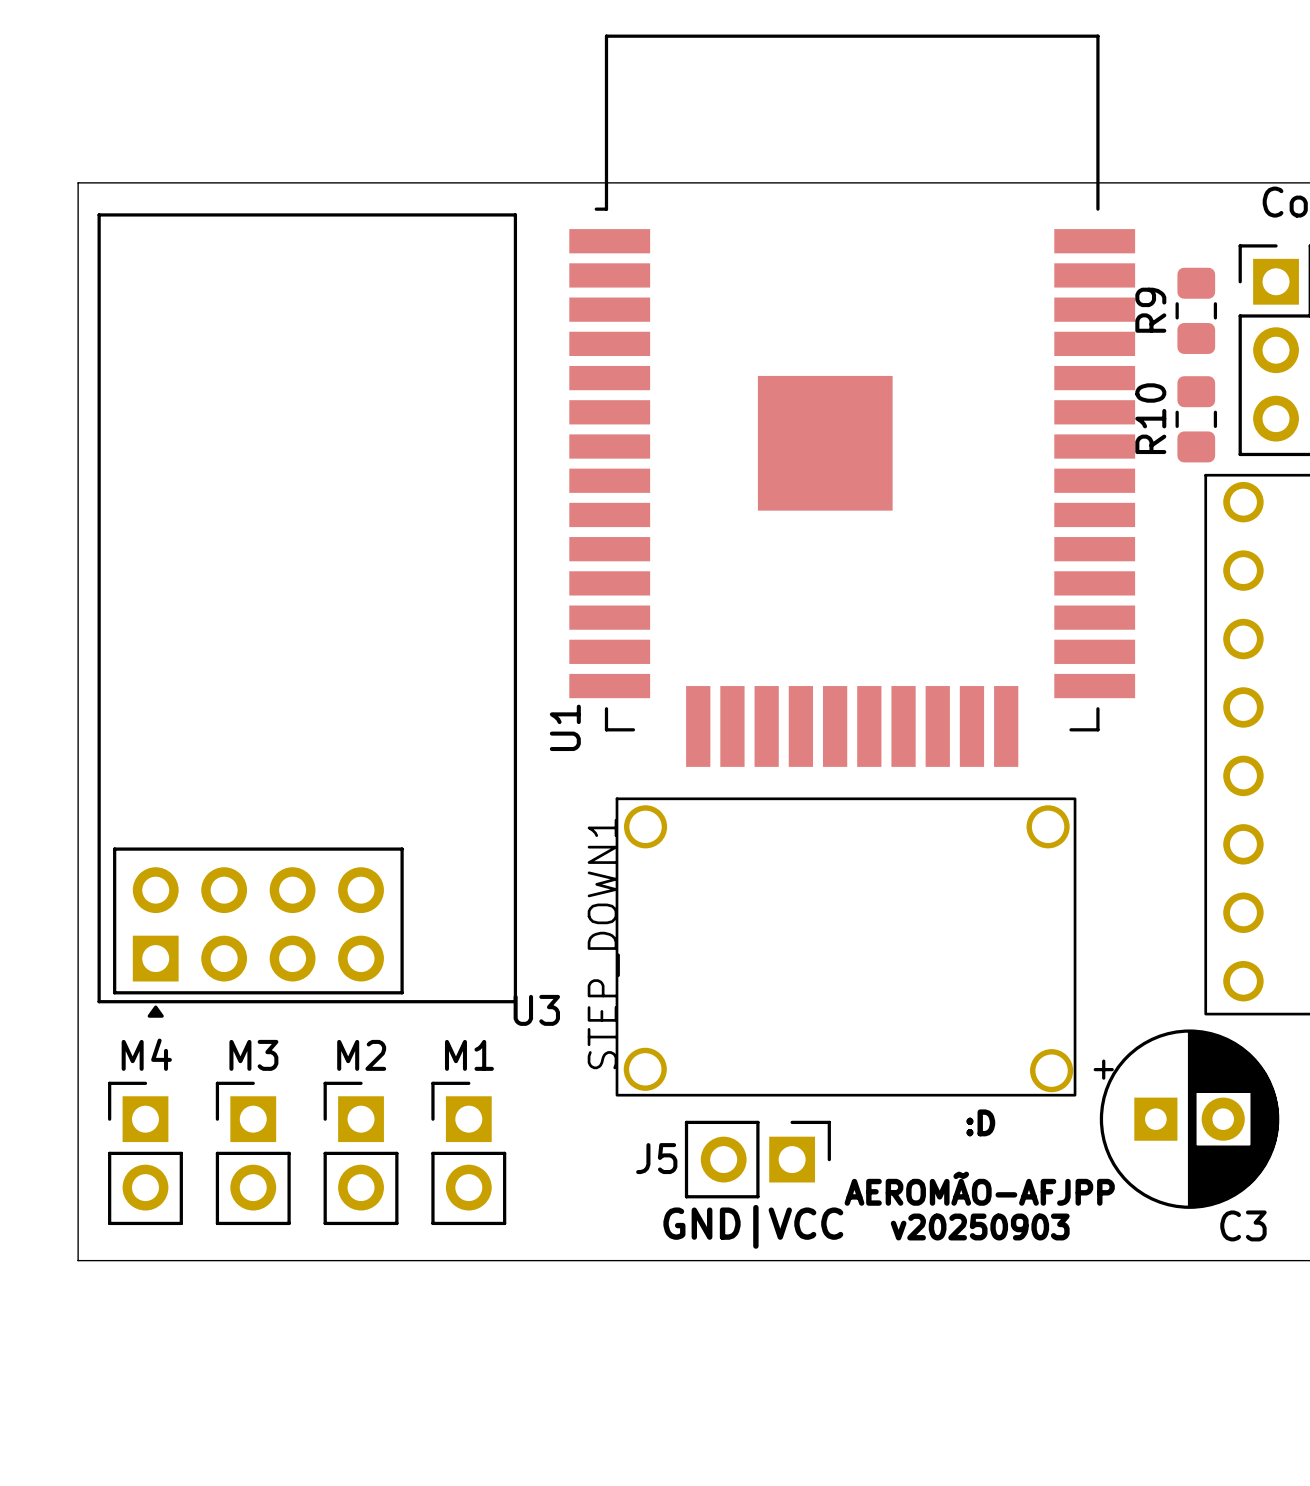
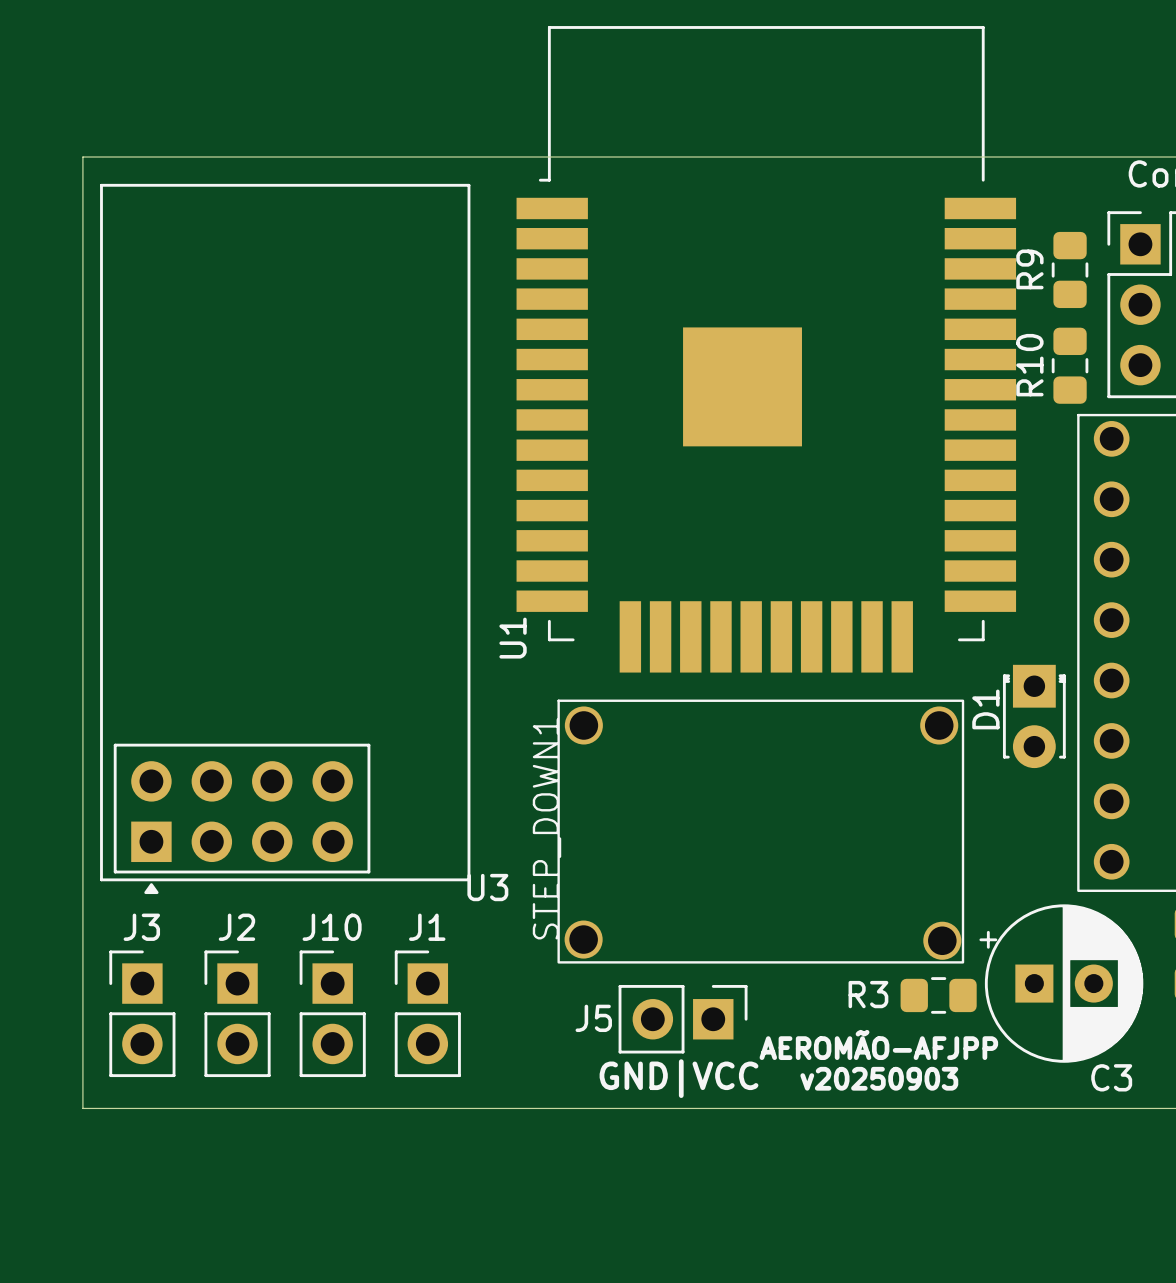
D1: none -> (1034, 716)
M4 name: M4 (146, 1054) -> J3 (141, 927)
M3 name: M3 (253, 1055) -> J2 (236, 927)
M2 name: M2 (361, 1055) -> J10 (332, 927)
M1 name: M1 (469, 1055) -> J1 (427, 927)
text: :D (980, 1122) -> none
R3: none -> (938, 995)

